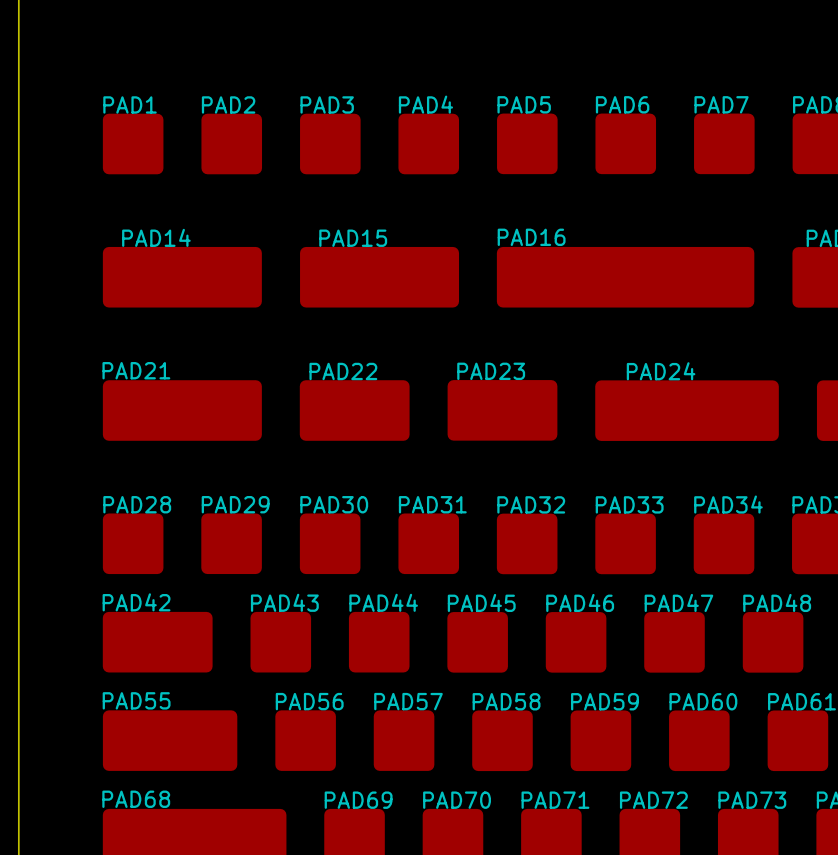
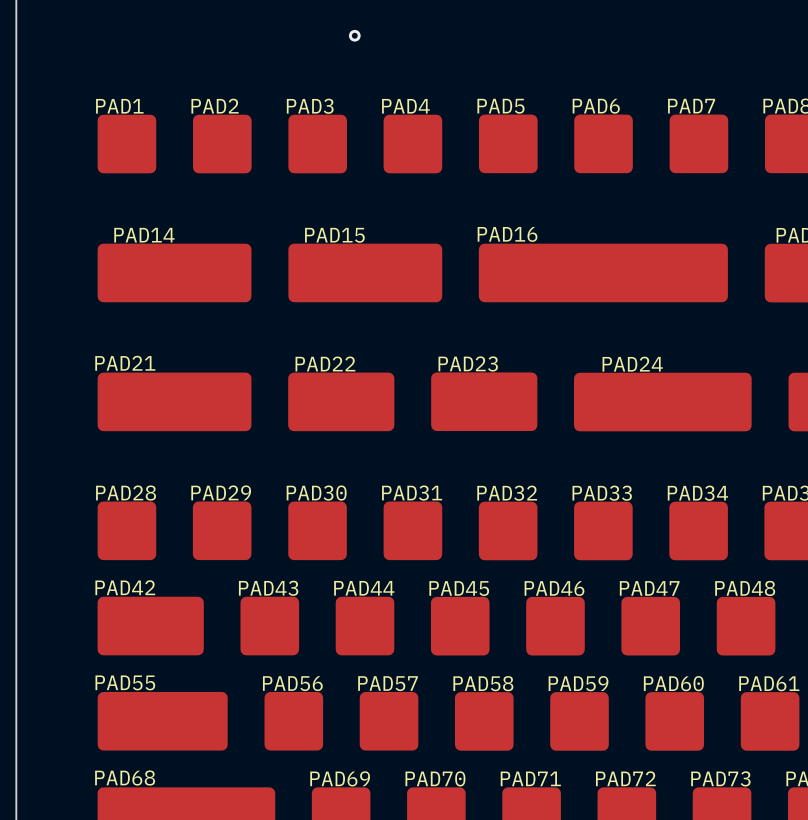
via: none -> (354, 35)

